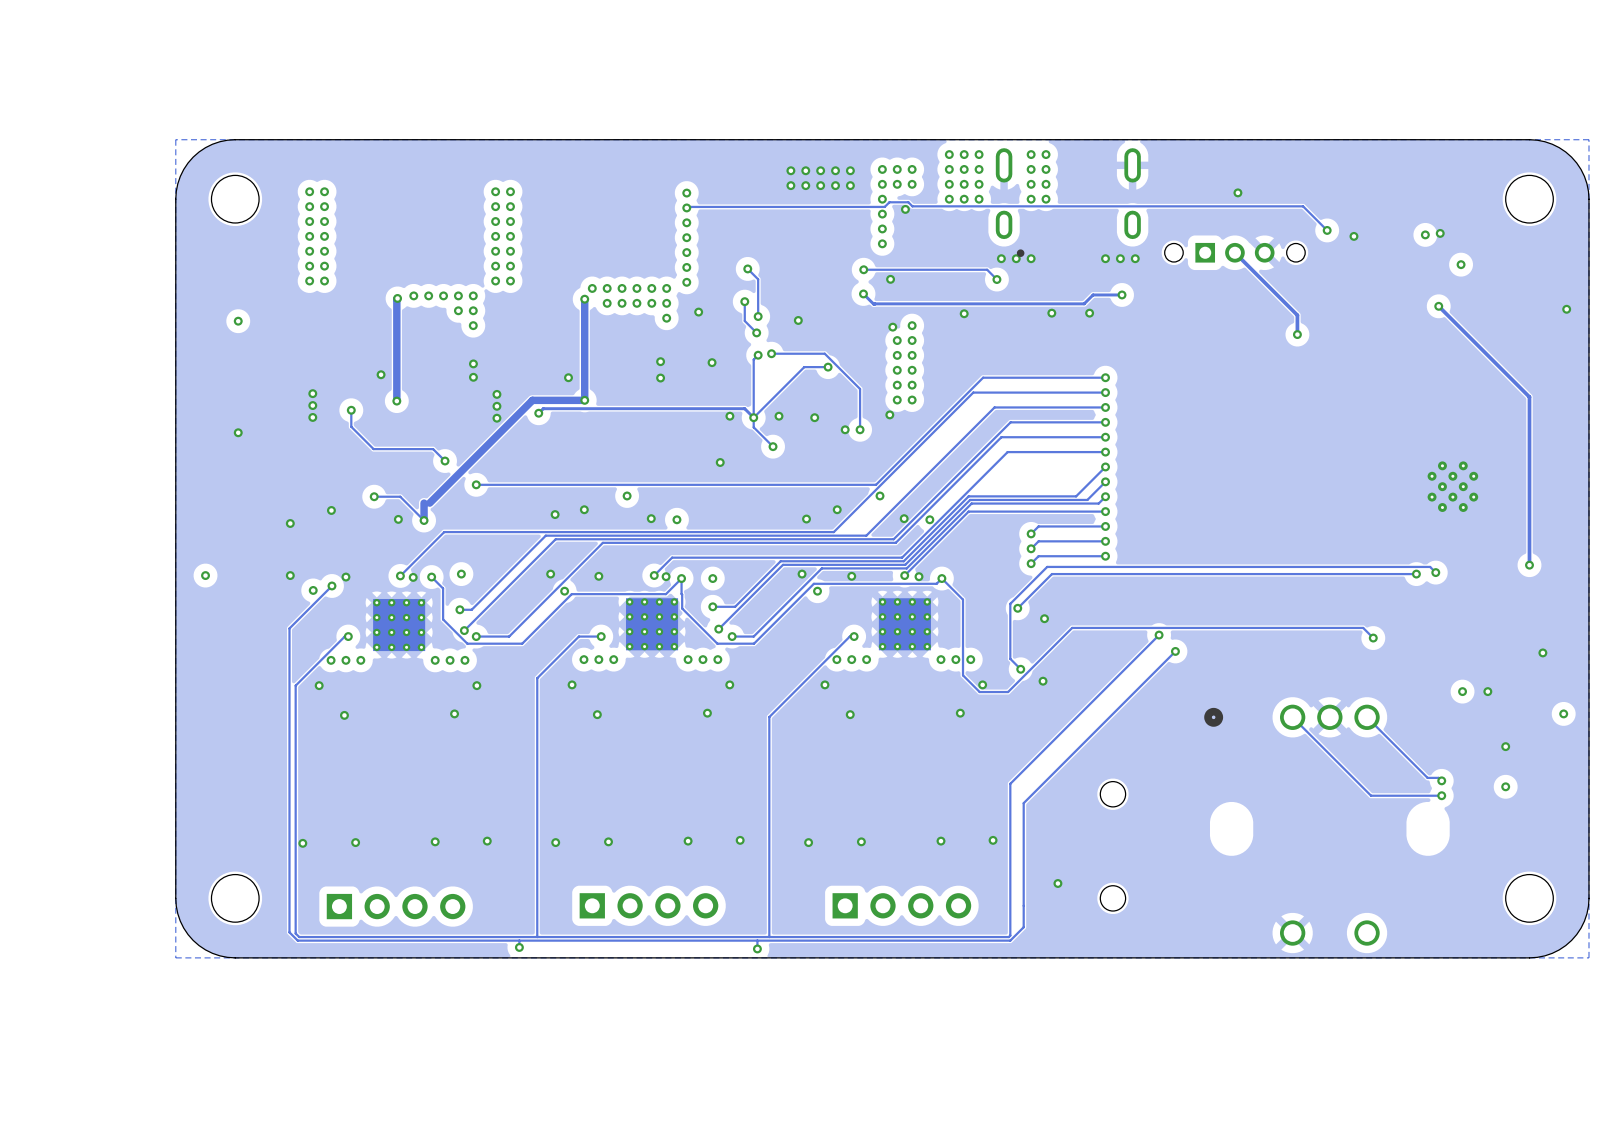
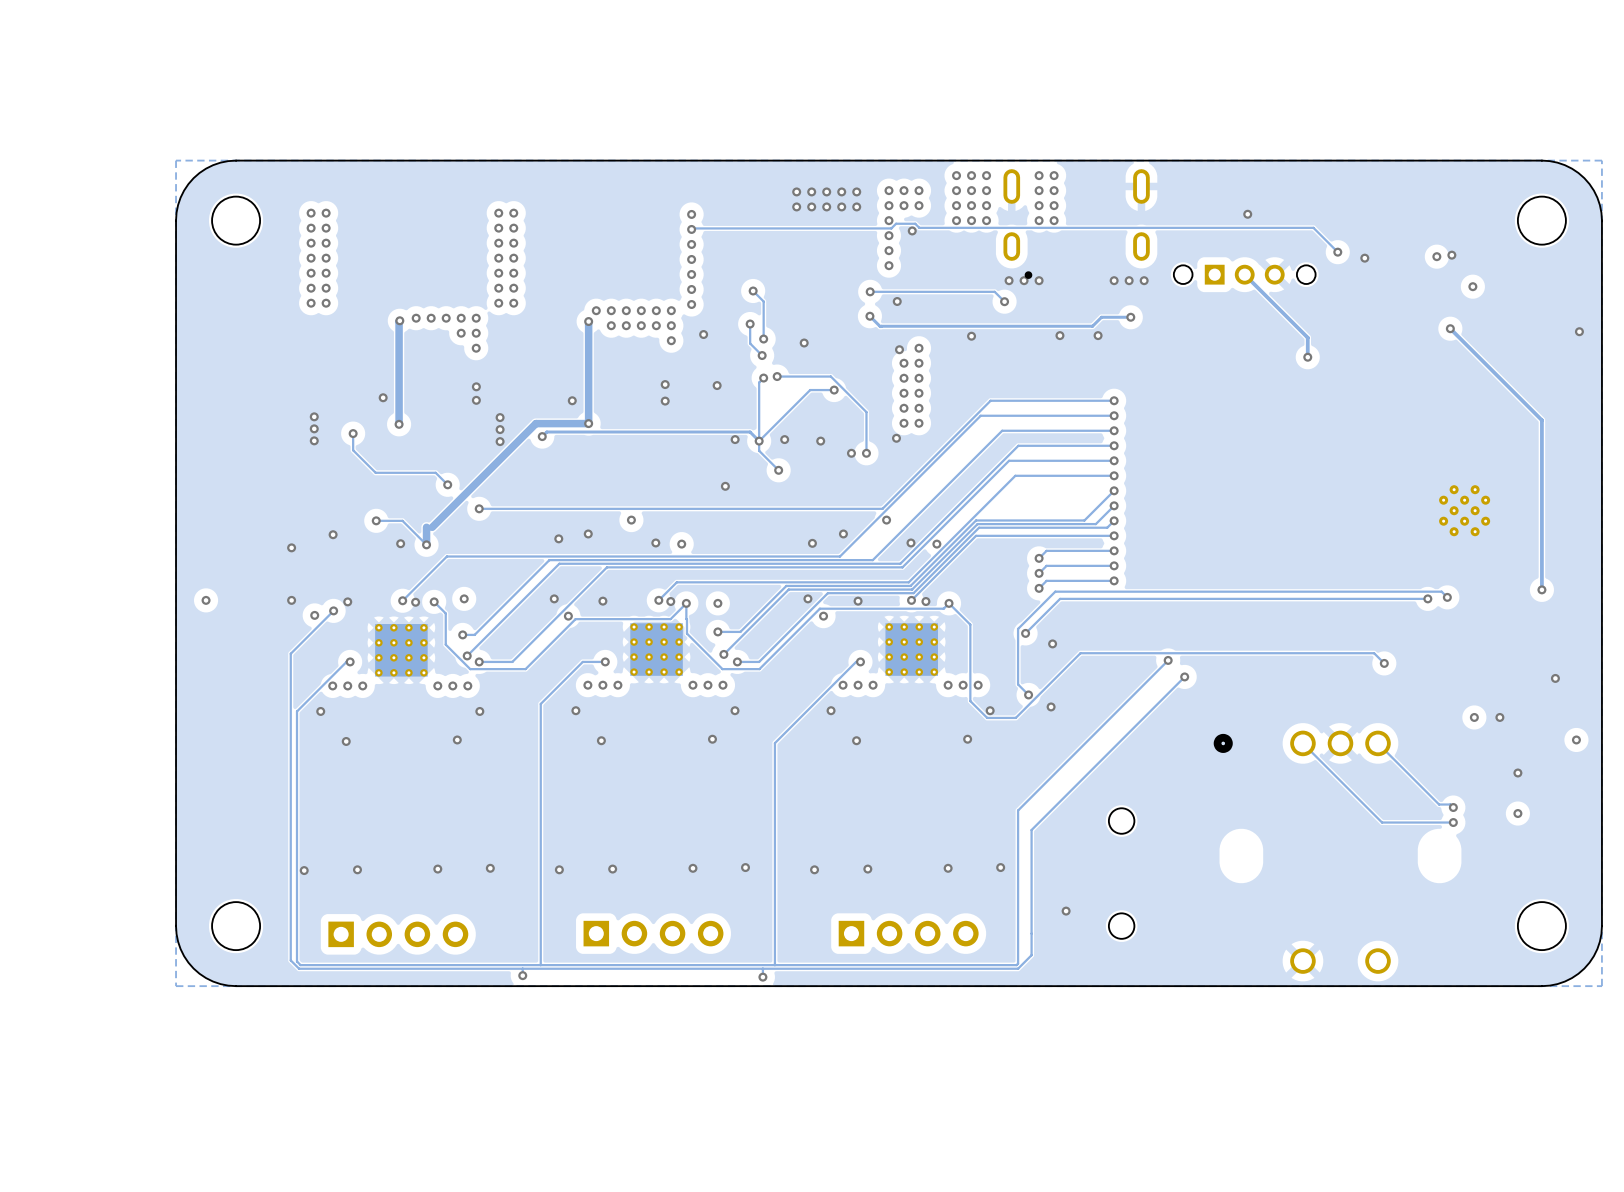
via: (238, 321) -> none
via: (238, 432) -> none

